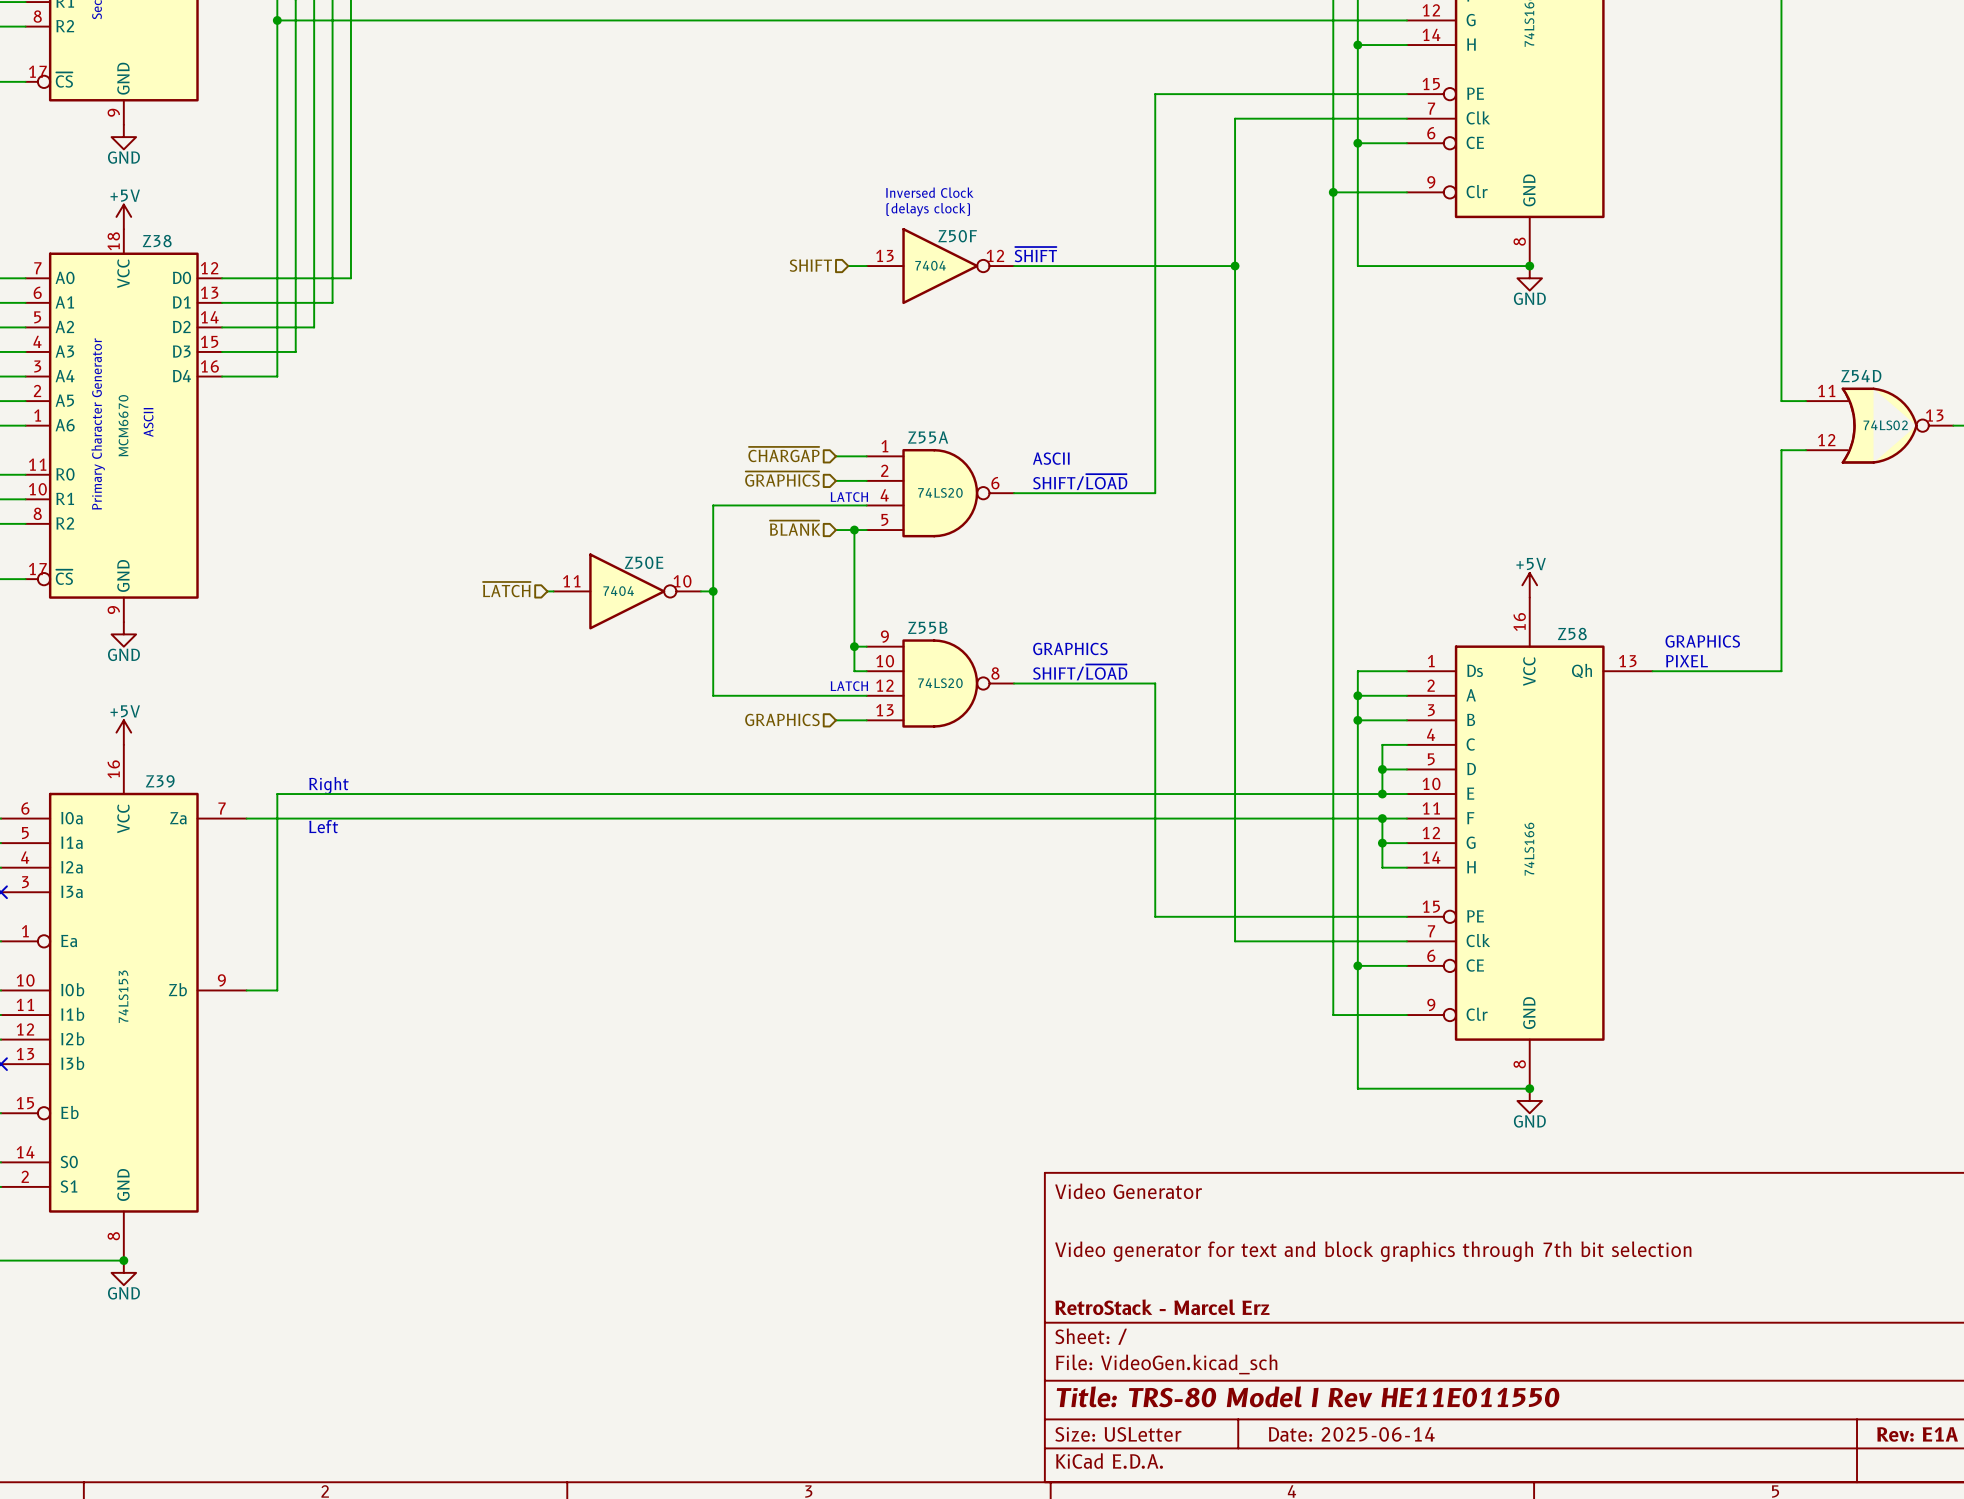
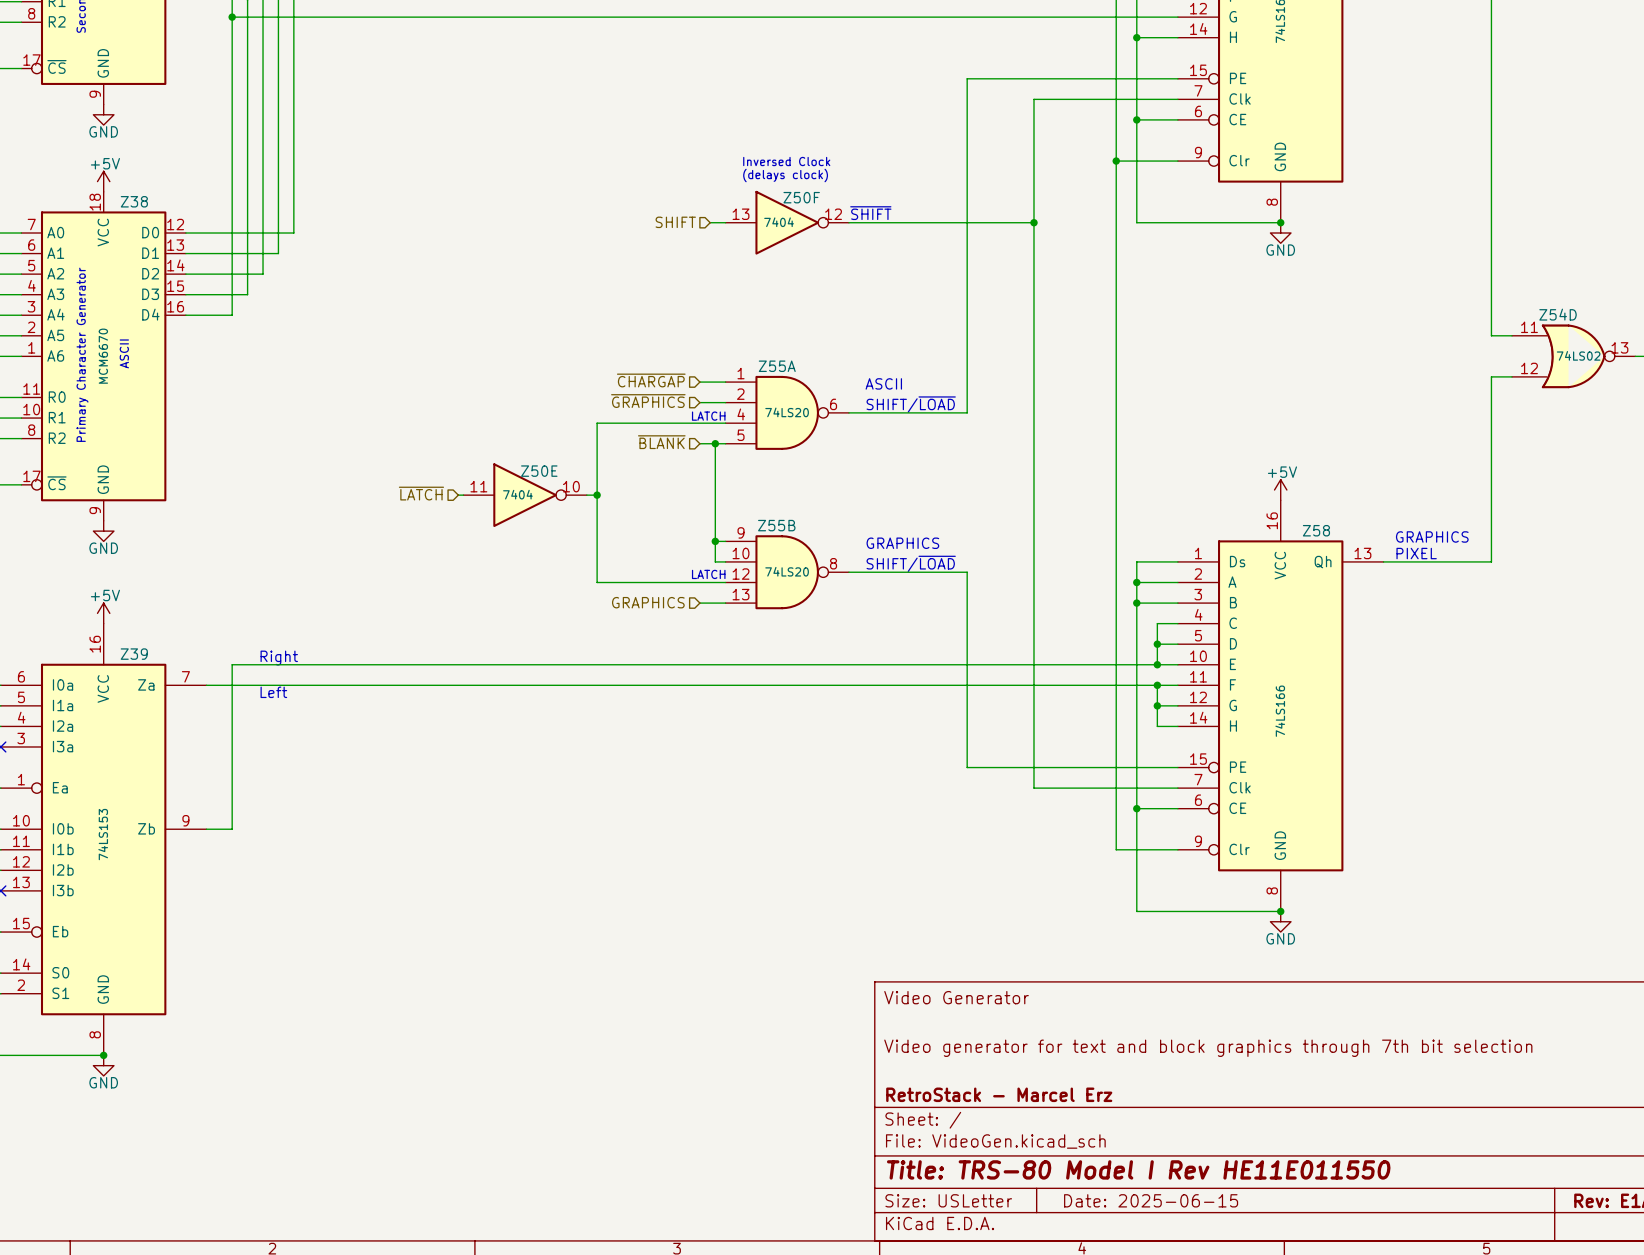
title block: Date: 2025-06-14 (1351, 1434) -> Date: 2025-06-15 (1151, 1200)

